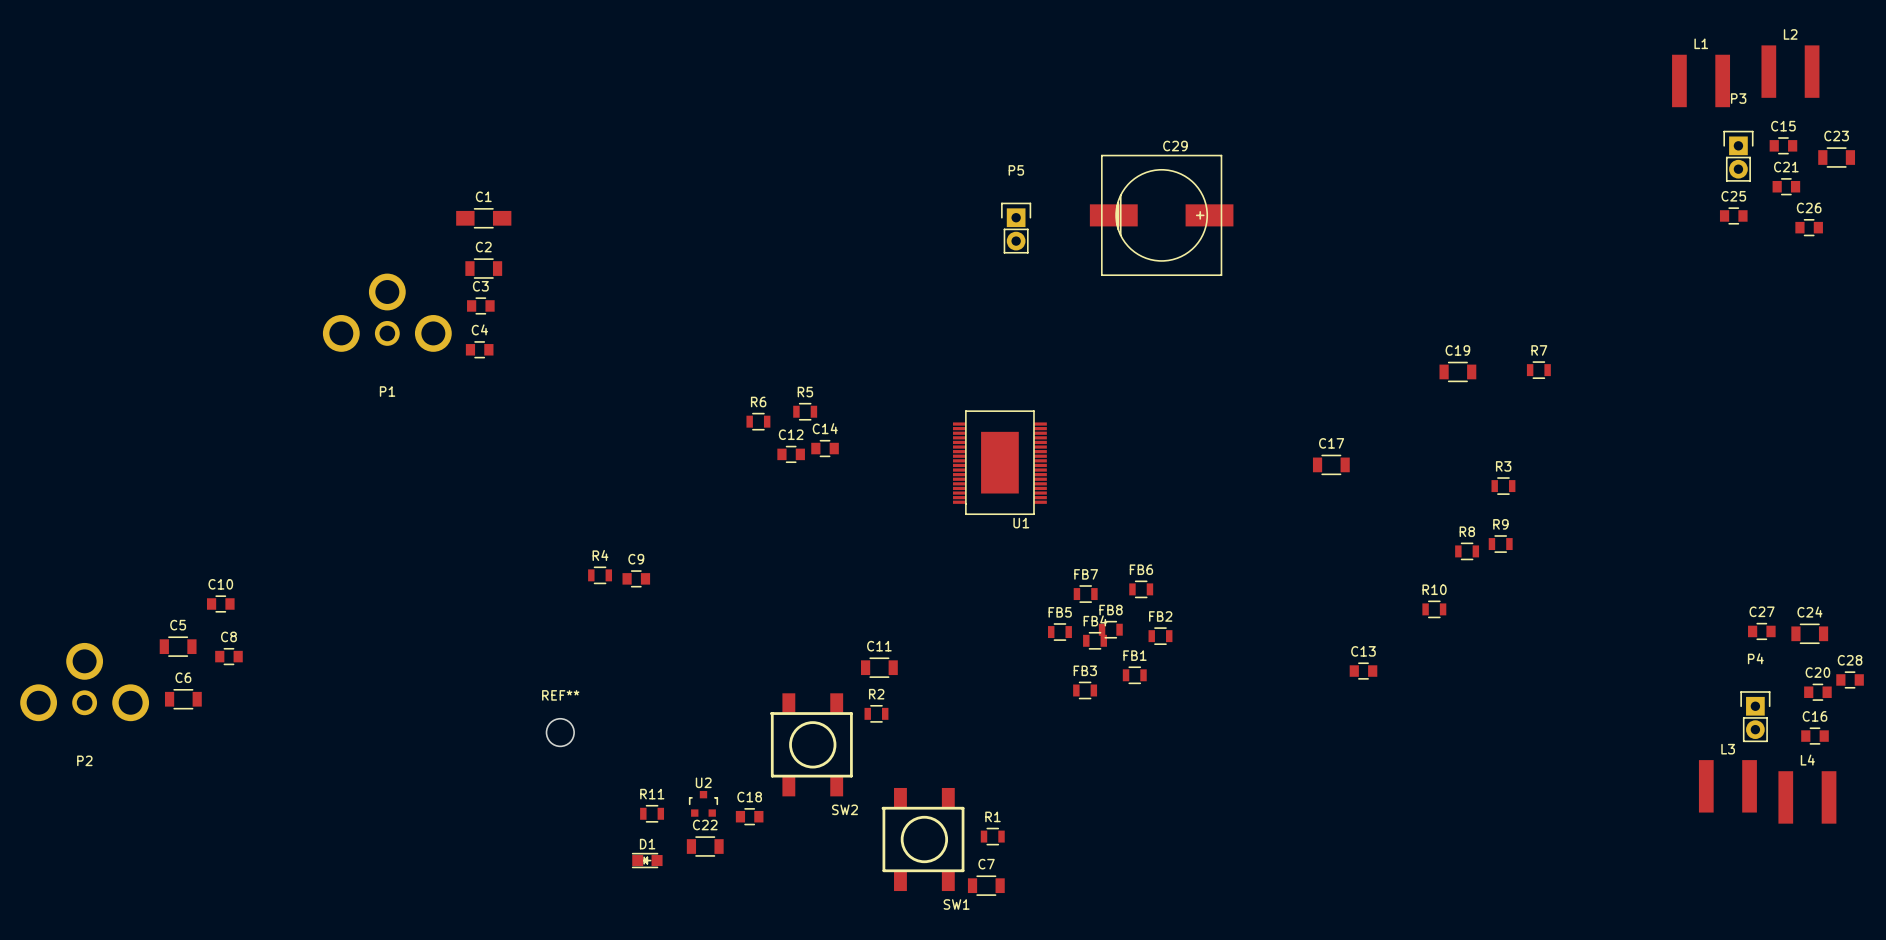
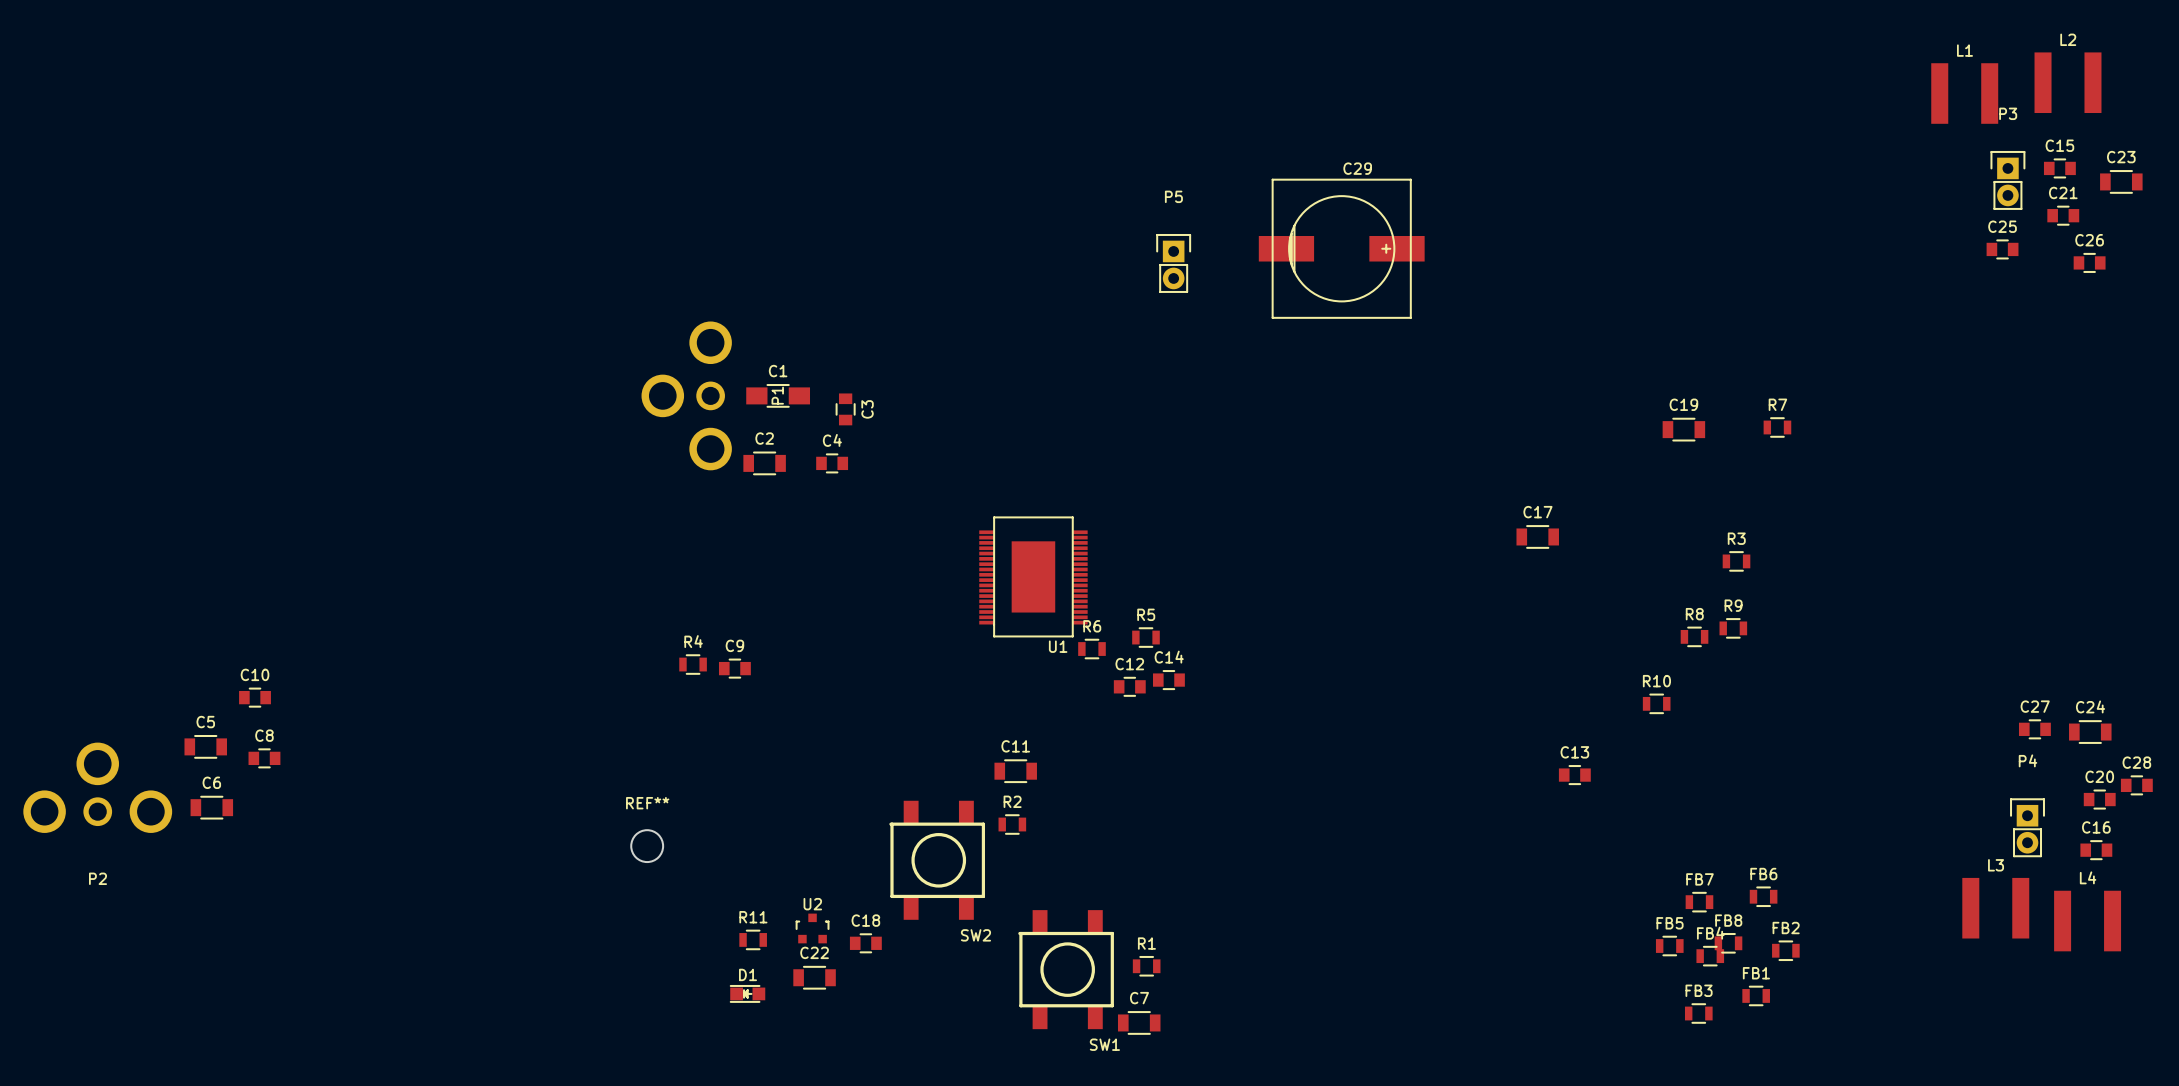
C1 position: (483, 218) -> (778, 395)
C2 position: (483, 268) -> (764, 463)
C3 rotation: 0° (480, 305) -> 90° clockwise (845, 409)
C3 position: (480, 305) -> (845, 409)
P1 rotation: 0° (387, 312) -> 90° counterclockwise (686, 395)
P1 position: (387, 312) -> (686, 395)
C4 position: (479, 349) -> (832, 463)
R5 position: (805, 411) -> (1145, 637)
R6 position: (758, 421) -> (1091, 649)
C14 position: (825, 448) -> (1168, 680)
C12 position: (791, 454) -> (1129, 686)
U1 position: (999, 462) -> (1033, 576)
FB6 position: (1141, 589) -> (1763, 896)
FB7 position: (1085, 594) -> (1699, 902)
FB8 position: (1110, 629) -> (1728, 943)
FB5 position: (1059, 632) -> (1669, 946)
FB2 position: (1160, 636) -> (1785, 950)
FB4 position: (1095, 640) -> (1710, 956)
FB1 position: (1134, 675) -> (1756, 995)
FB3 position: (1085, 690) -> (1698, 1013)

